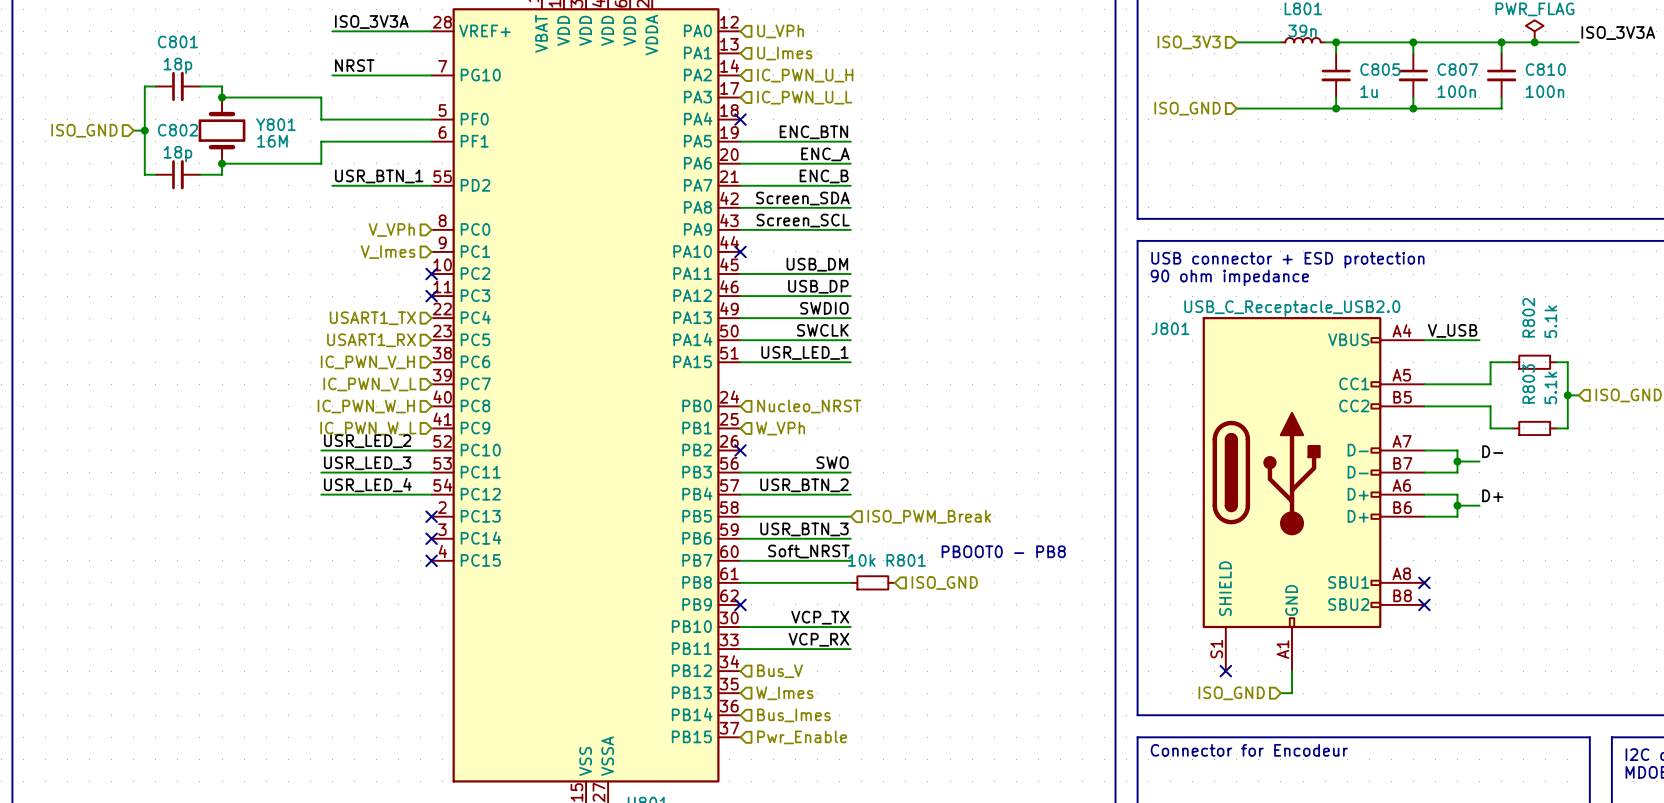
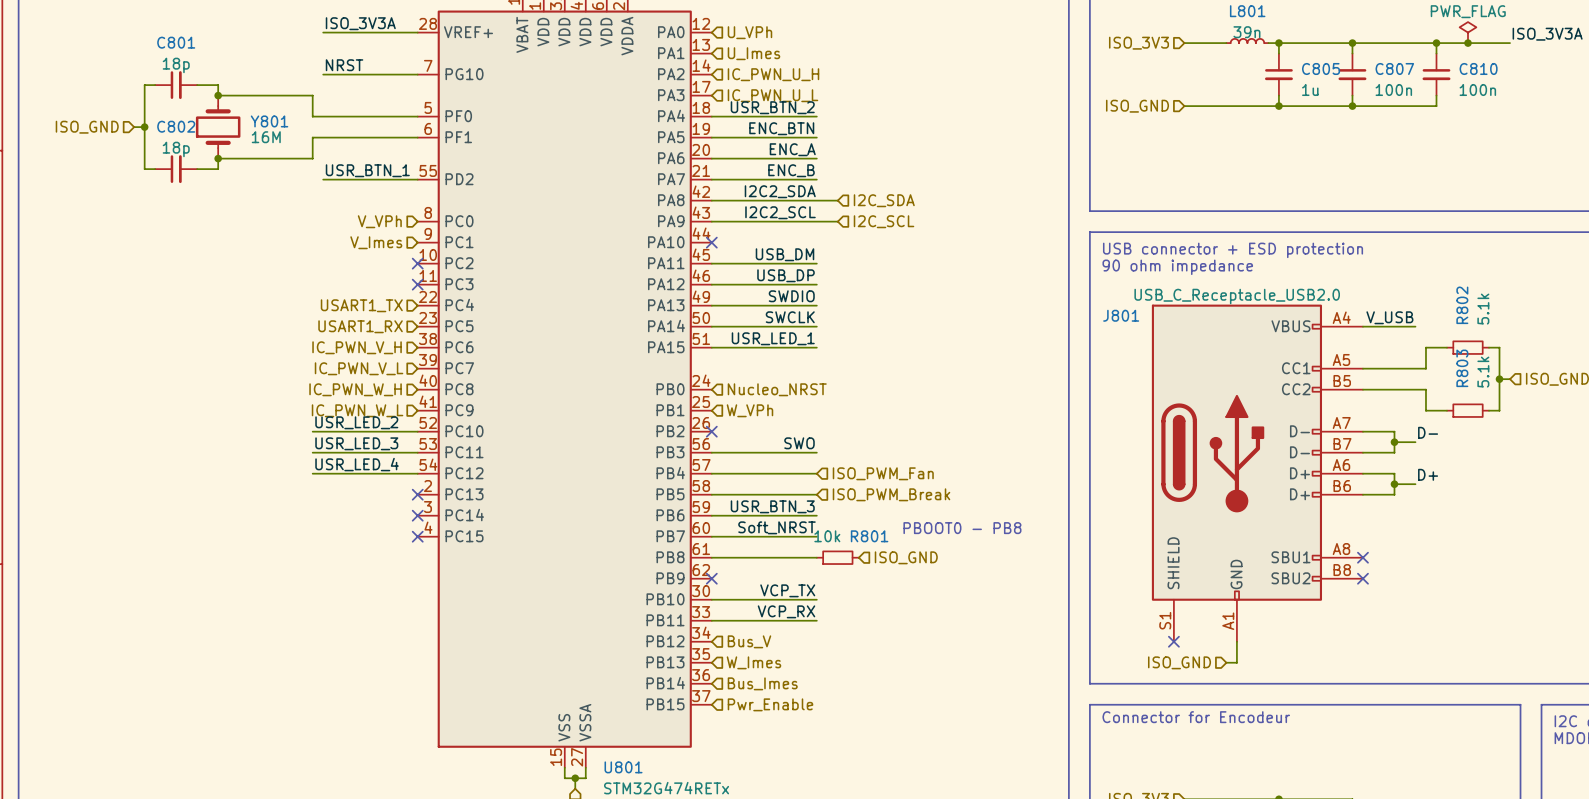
label: none -> USR_BTN_2 (772, 107)
wire: none -> (711, 116) (816, 116)
no-connect mark: (740, 119) -> none
label: Screen_SDA (802, 198) -> I2C2_SDA (780, 191)
wire: none -> (816, 200) (837, 200)
hierarchical label: none -> I2C_SDA (884, 200)
label: Screen_SCL (803, 220) -> I2C2_SCL (780, 212)
wire: none -> (816, 221) (837, 221)
hierarchical label: none -> I2C_SCL (884, 221)
label: USR_BTN_2 (804, 485) -> none
hierarchical label: none -> ISO_PWM_Fan (883, 473)

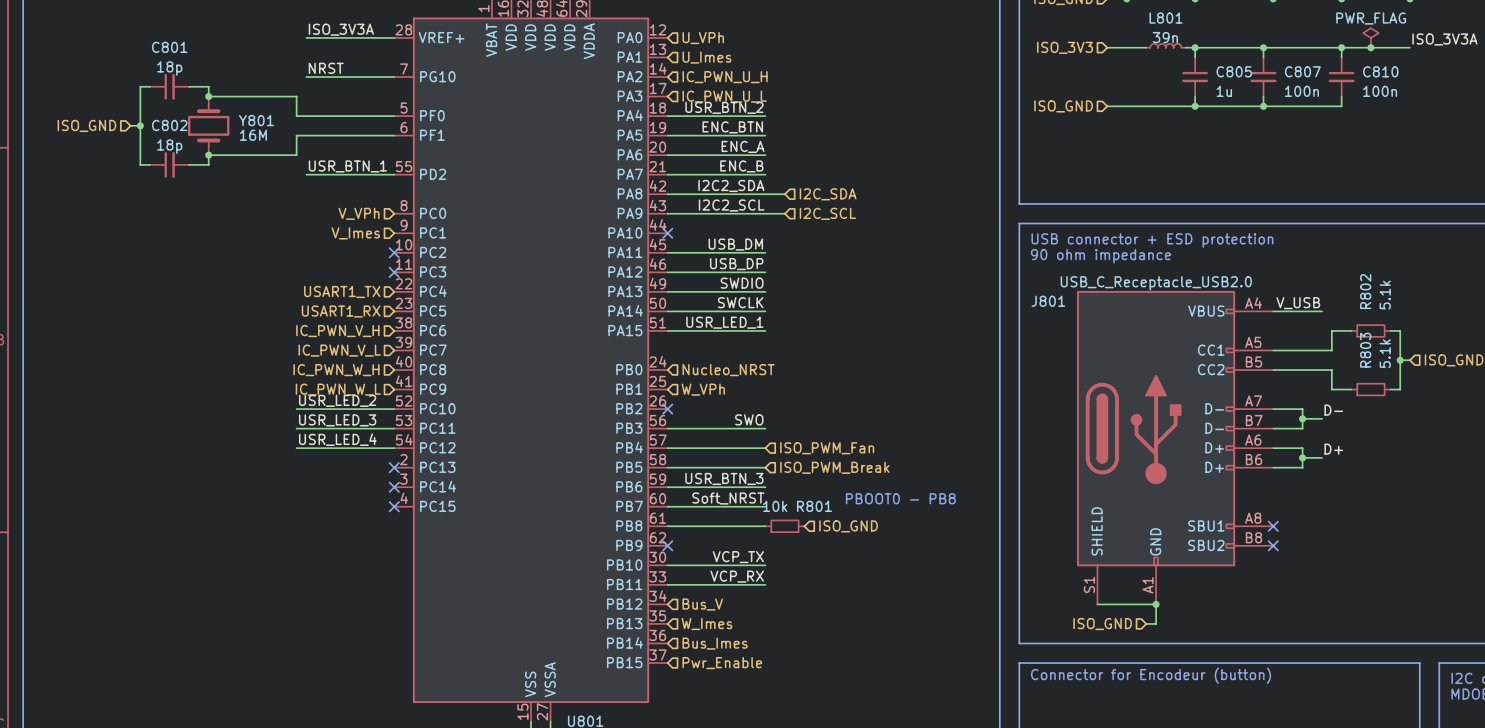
wire: none -> (1097, 604) (1156, 604)
no-connect mark: (1173, 641) -> none
junction: none -> (1156, 604)
text: Connector for Encodeur (1196, 717) -> Connector for Encodeur (button) (1151, 675)

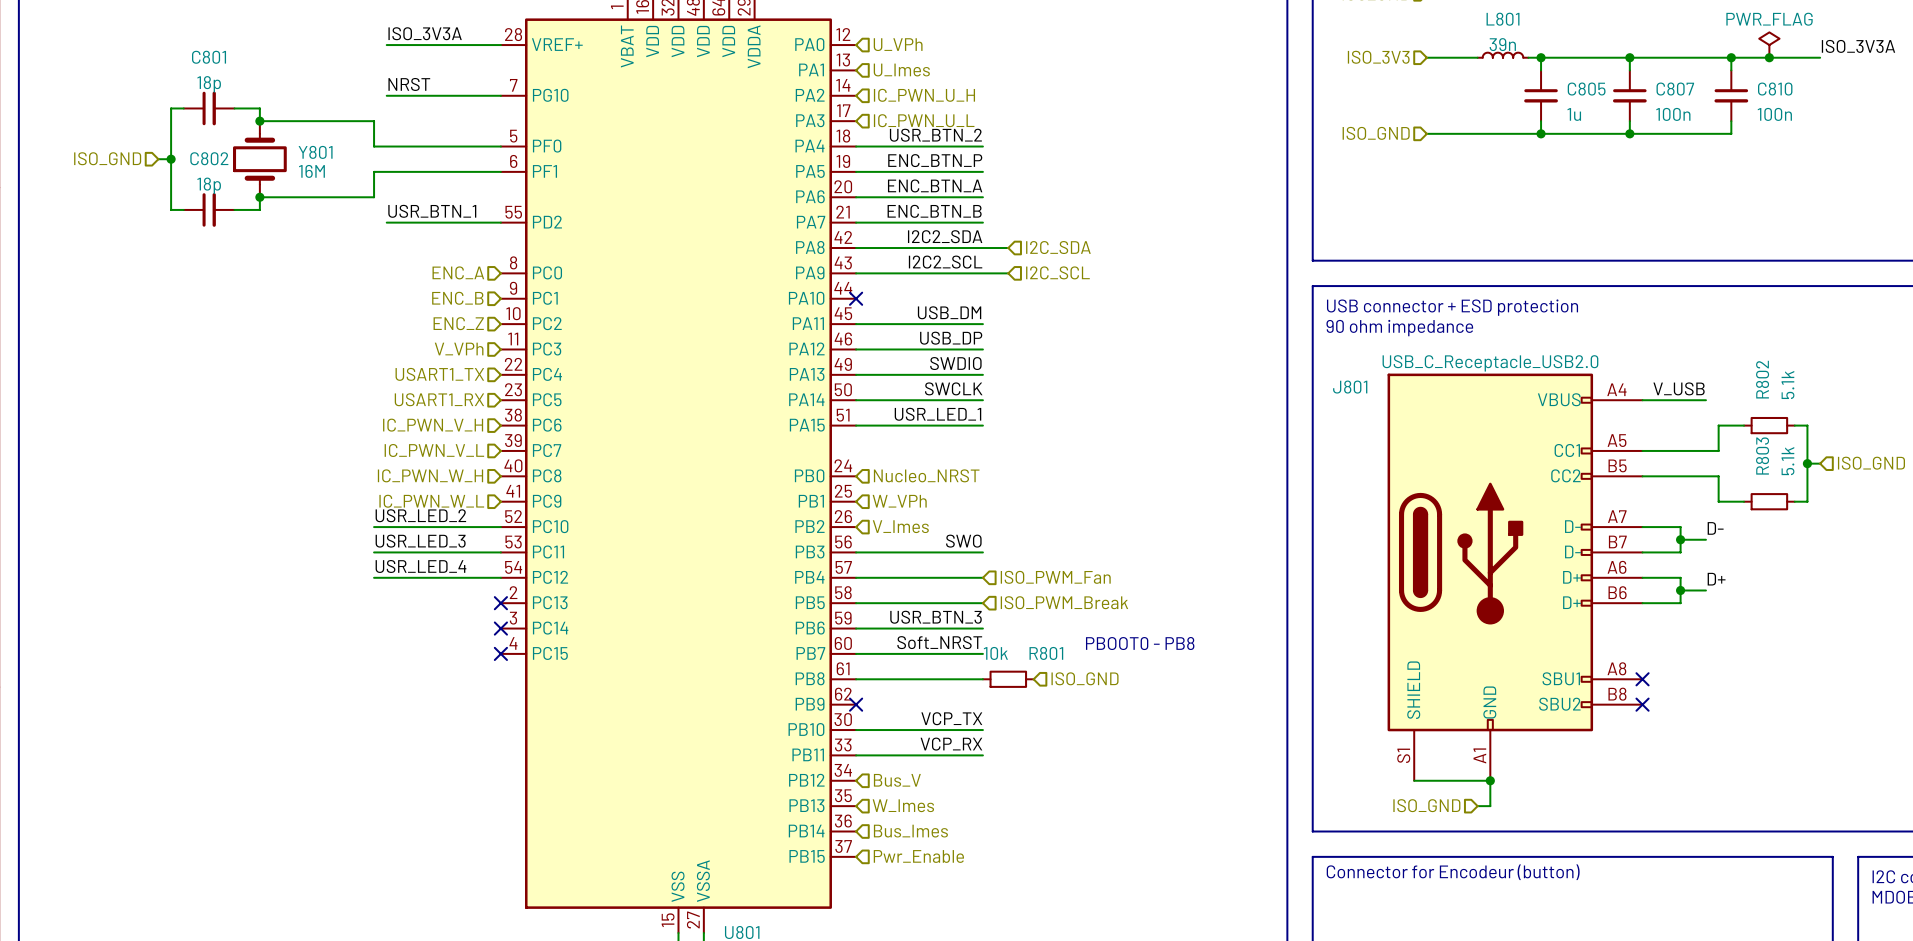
label: ENC_BTN (732, 127) -> ENC_BTN_P (935, 160)
label: ENC_A (743, 146) -> ENC_BTN_A (935, 185)
label: ENC_B (741, 166) -> ENC_BTN_B (934, 211)
hierarchical label: V_VPh (359, 213) -> ENC_A (458, 272)
hierarchical label: V_Imes (355, 233) -> ENC_B (457, 298)
hierarchical label: none -> ENC_Z (458, 323)
no-connect mark: (394, 252) -> none
hierarchical label: none -> V_VPh (459, 349)
no-connect mark: (394, 272) -> none
no-connect mark: (667, 409) -> none
hierarchical label: none -> V_Imes (900, 526)

